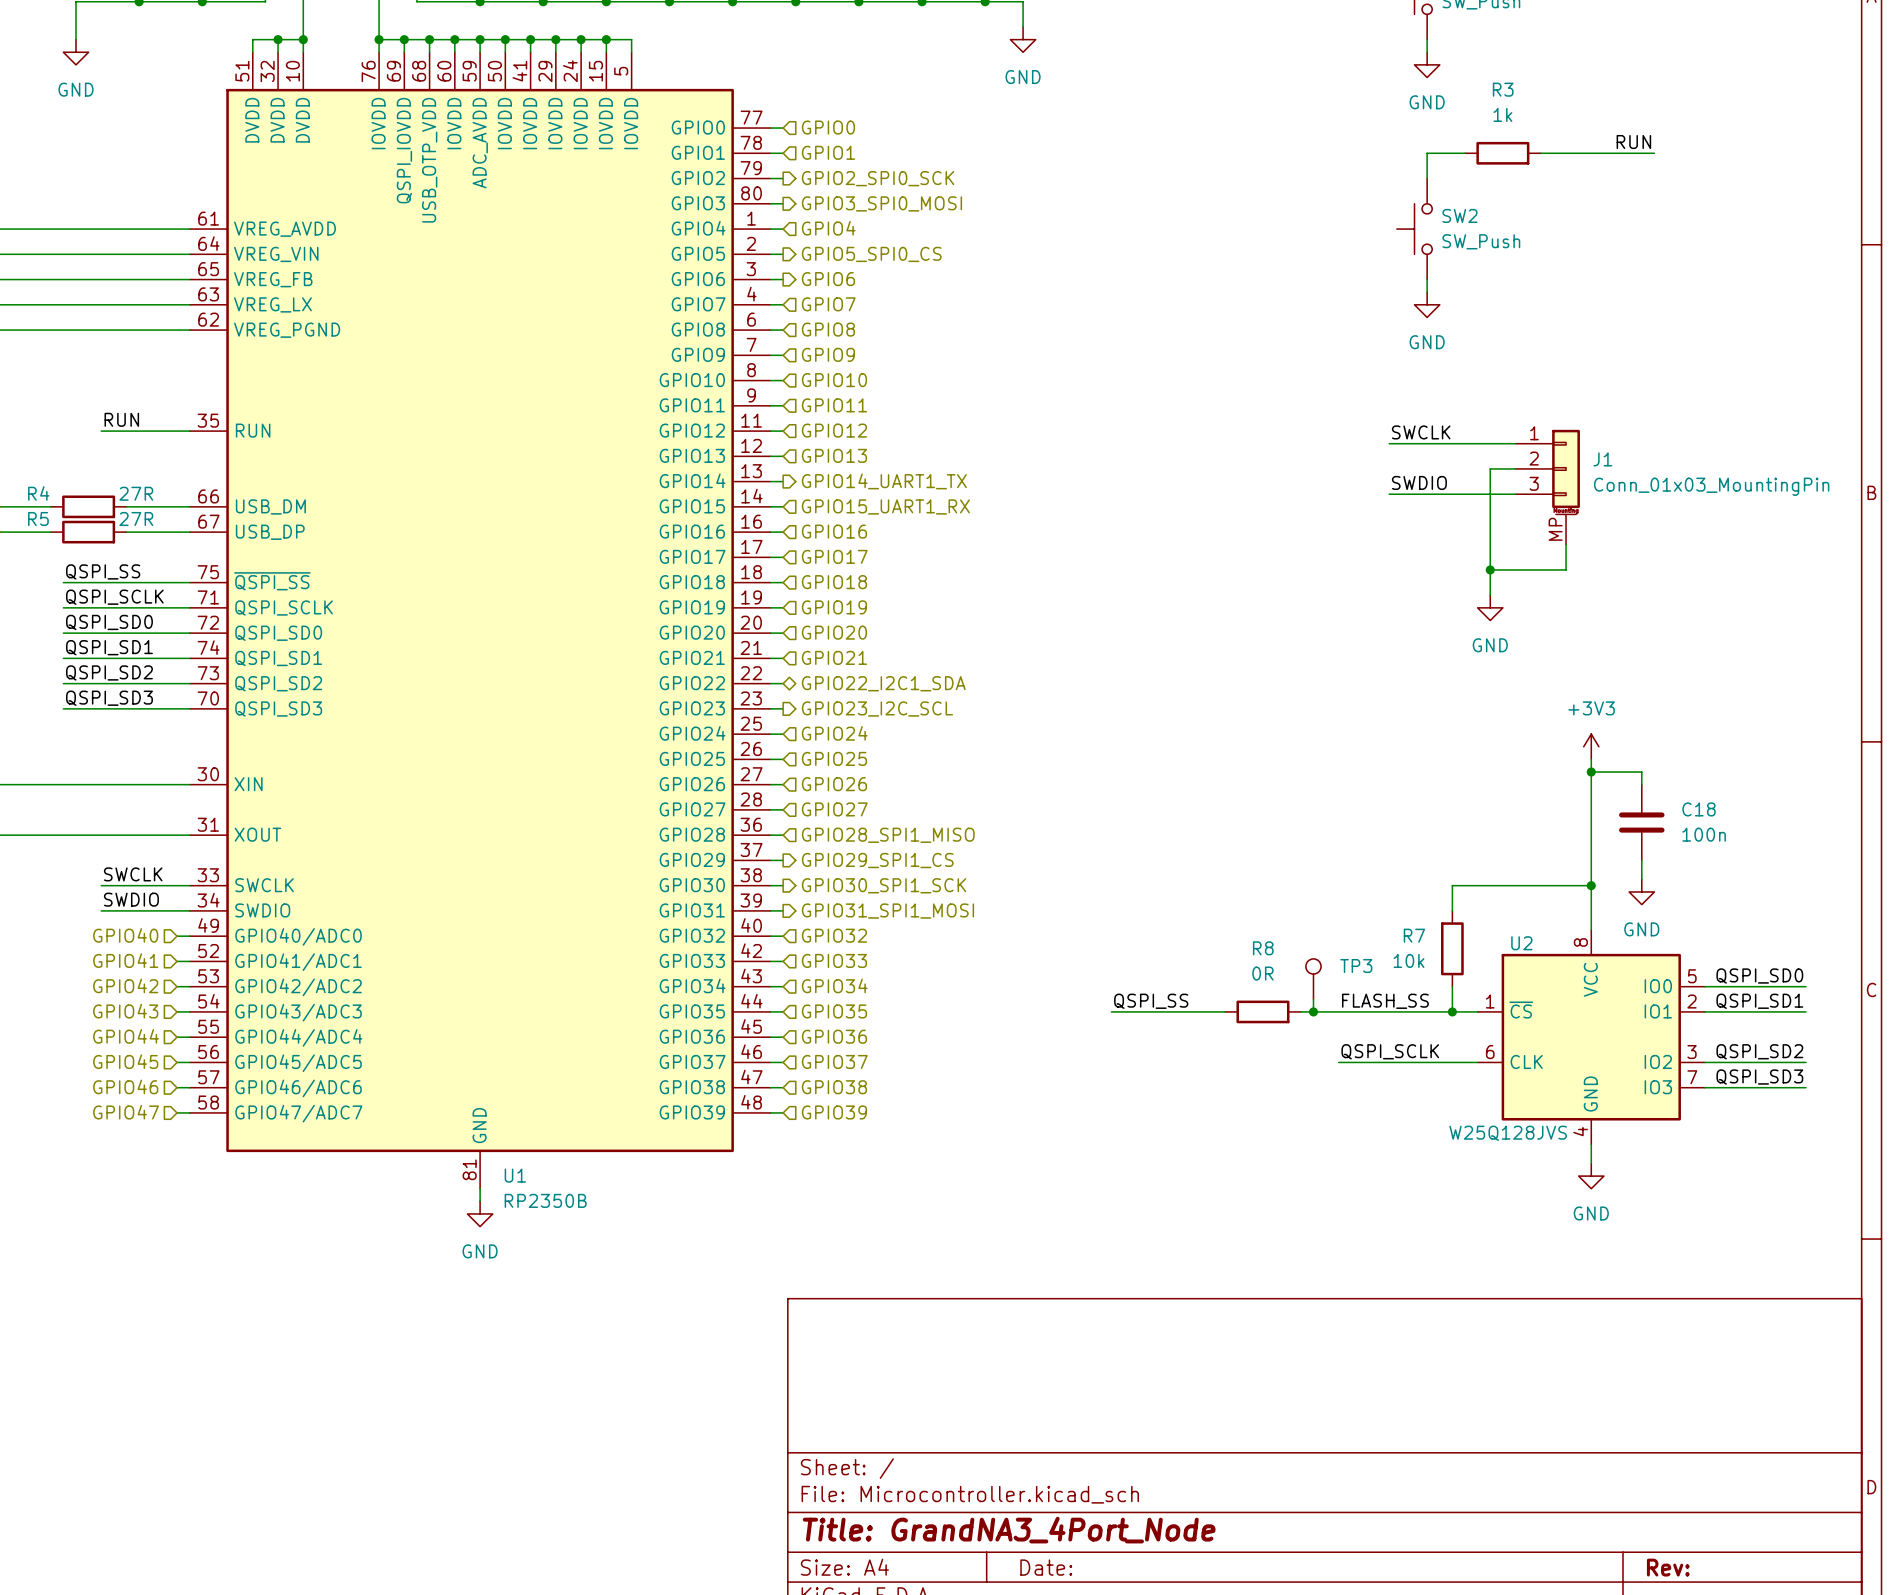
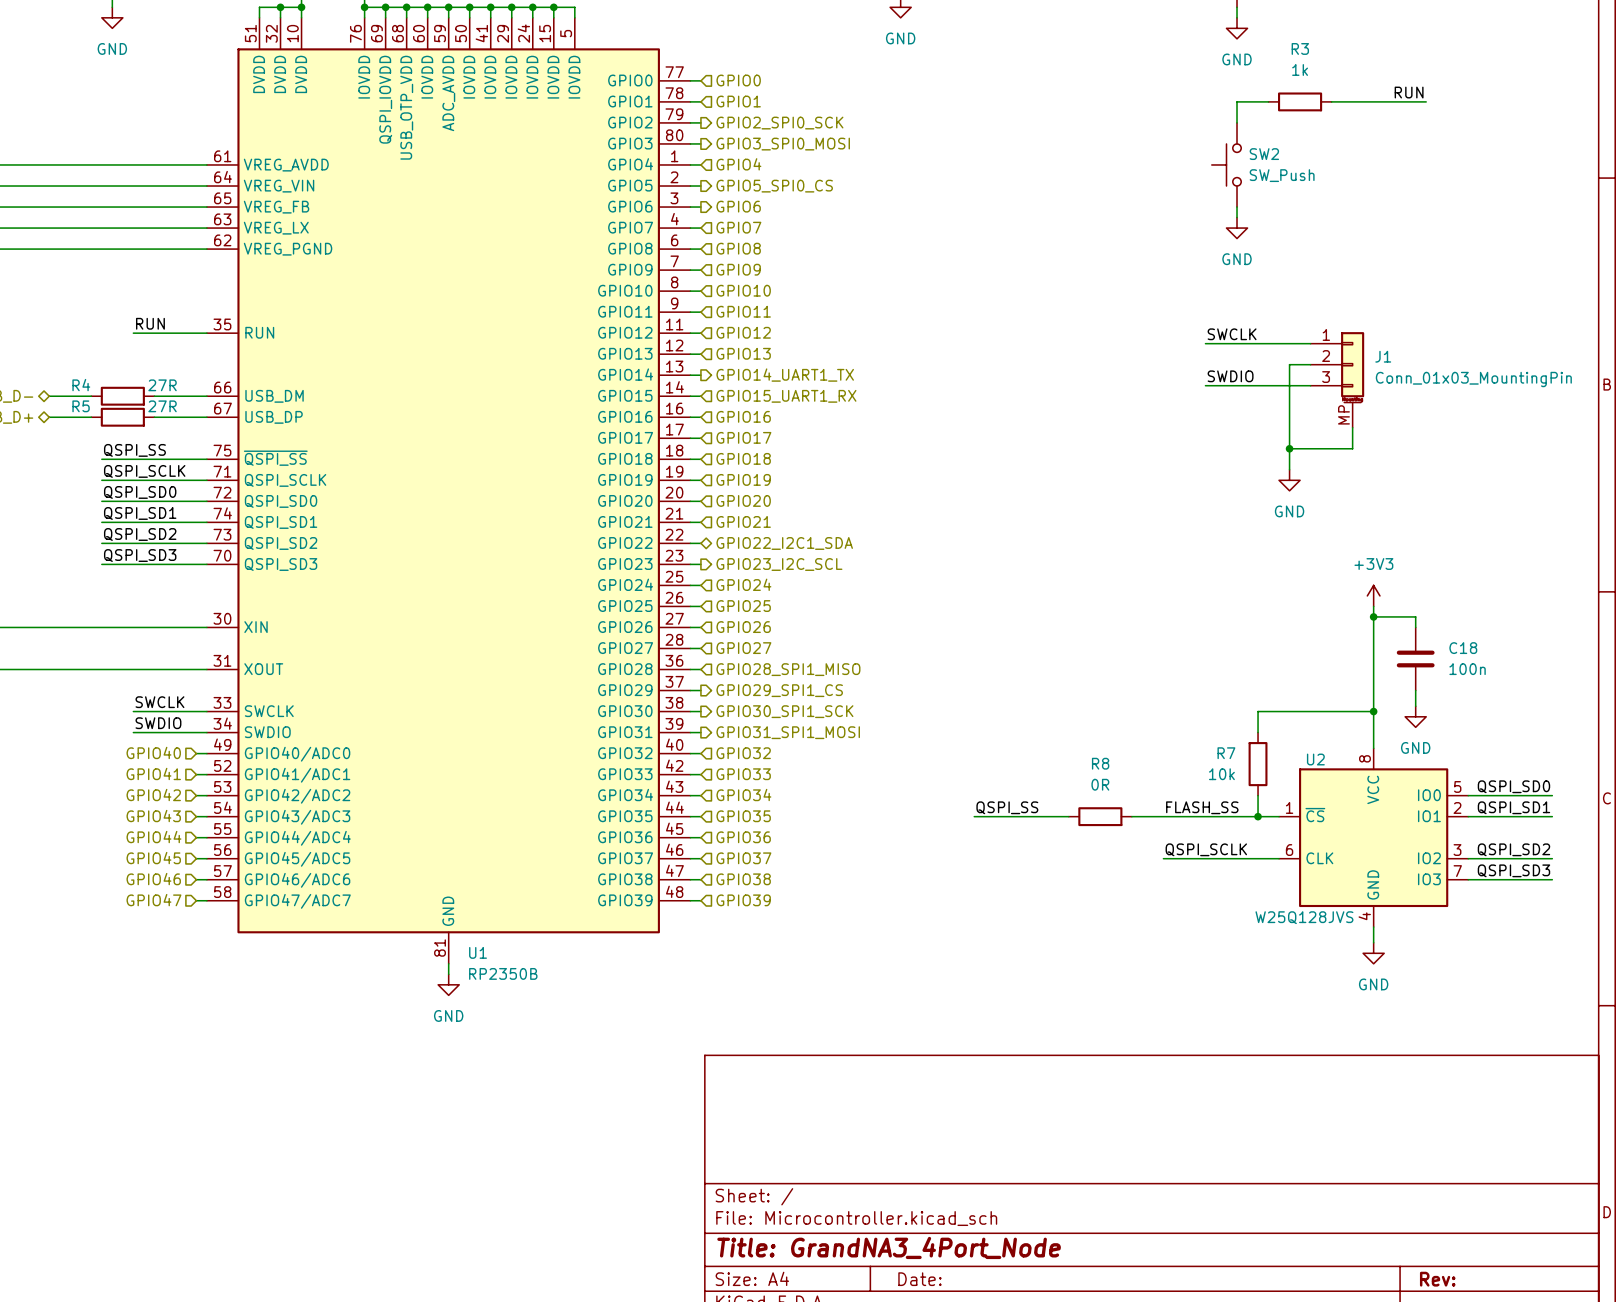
TP3: (1313, 979) -> none
wire: (1313, 999) (1313, 1011) -> none
junction: (1313, 1011) -> none

